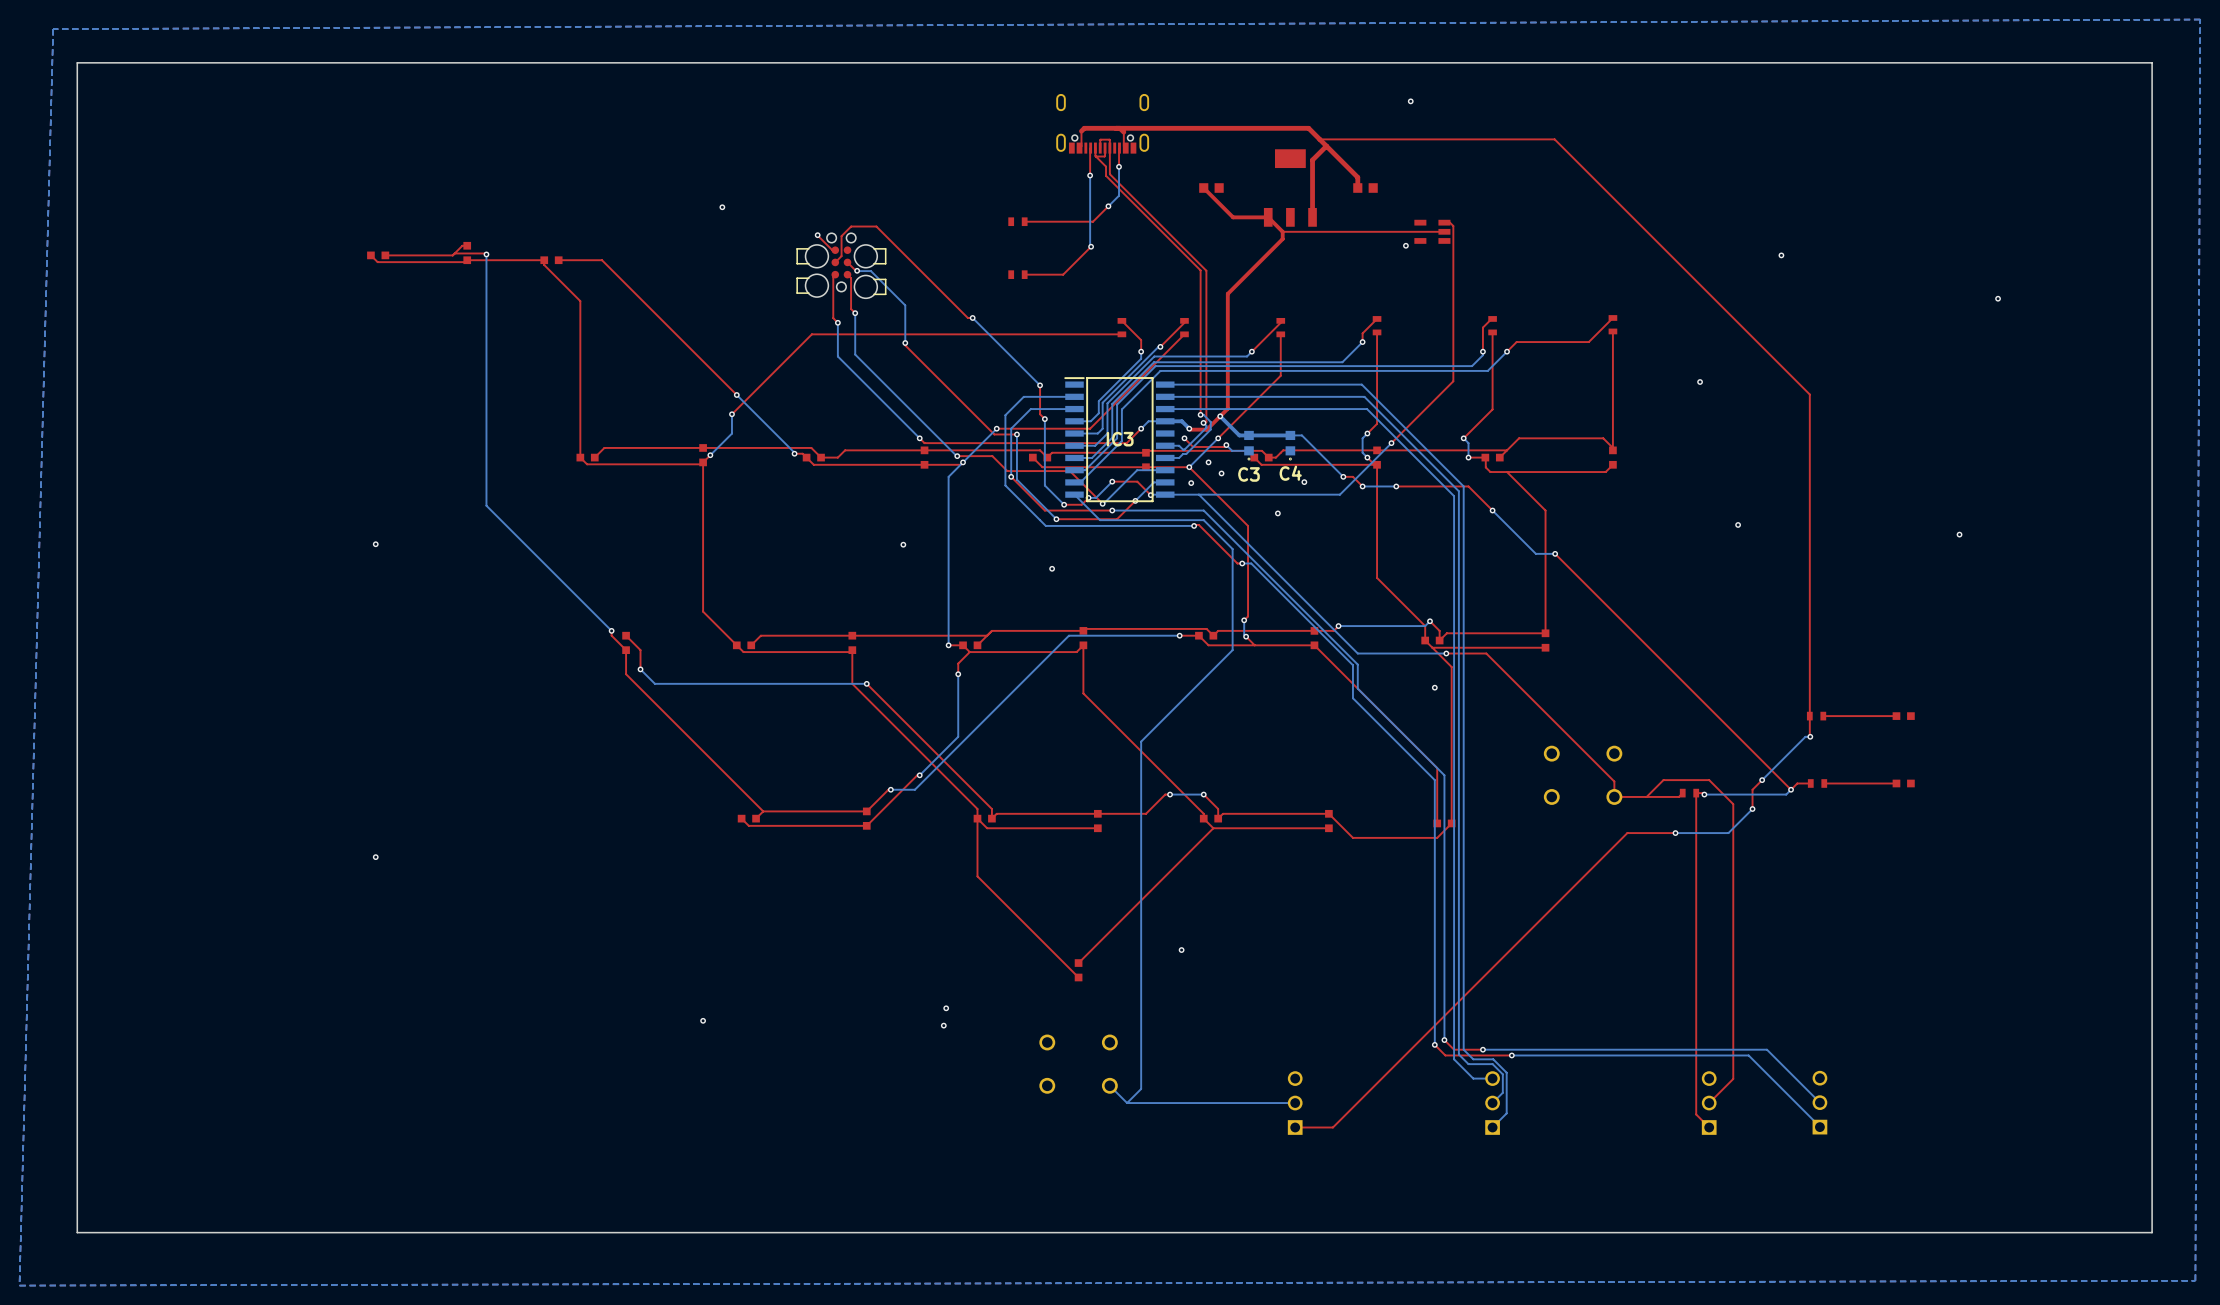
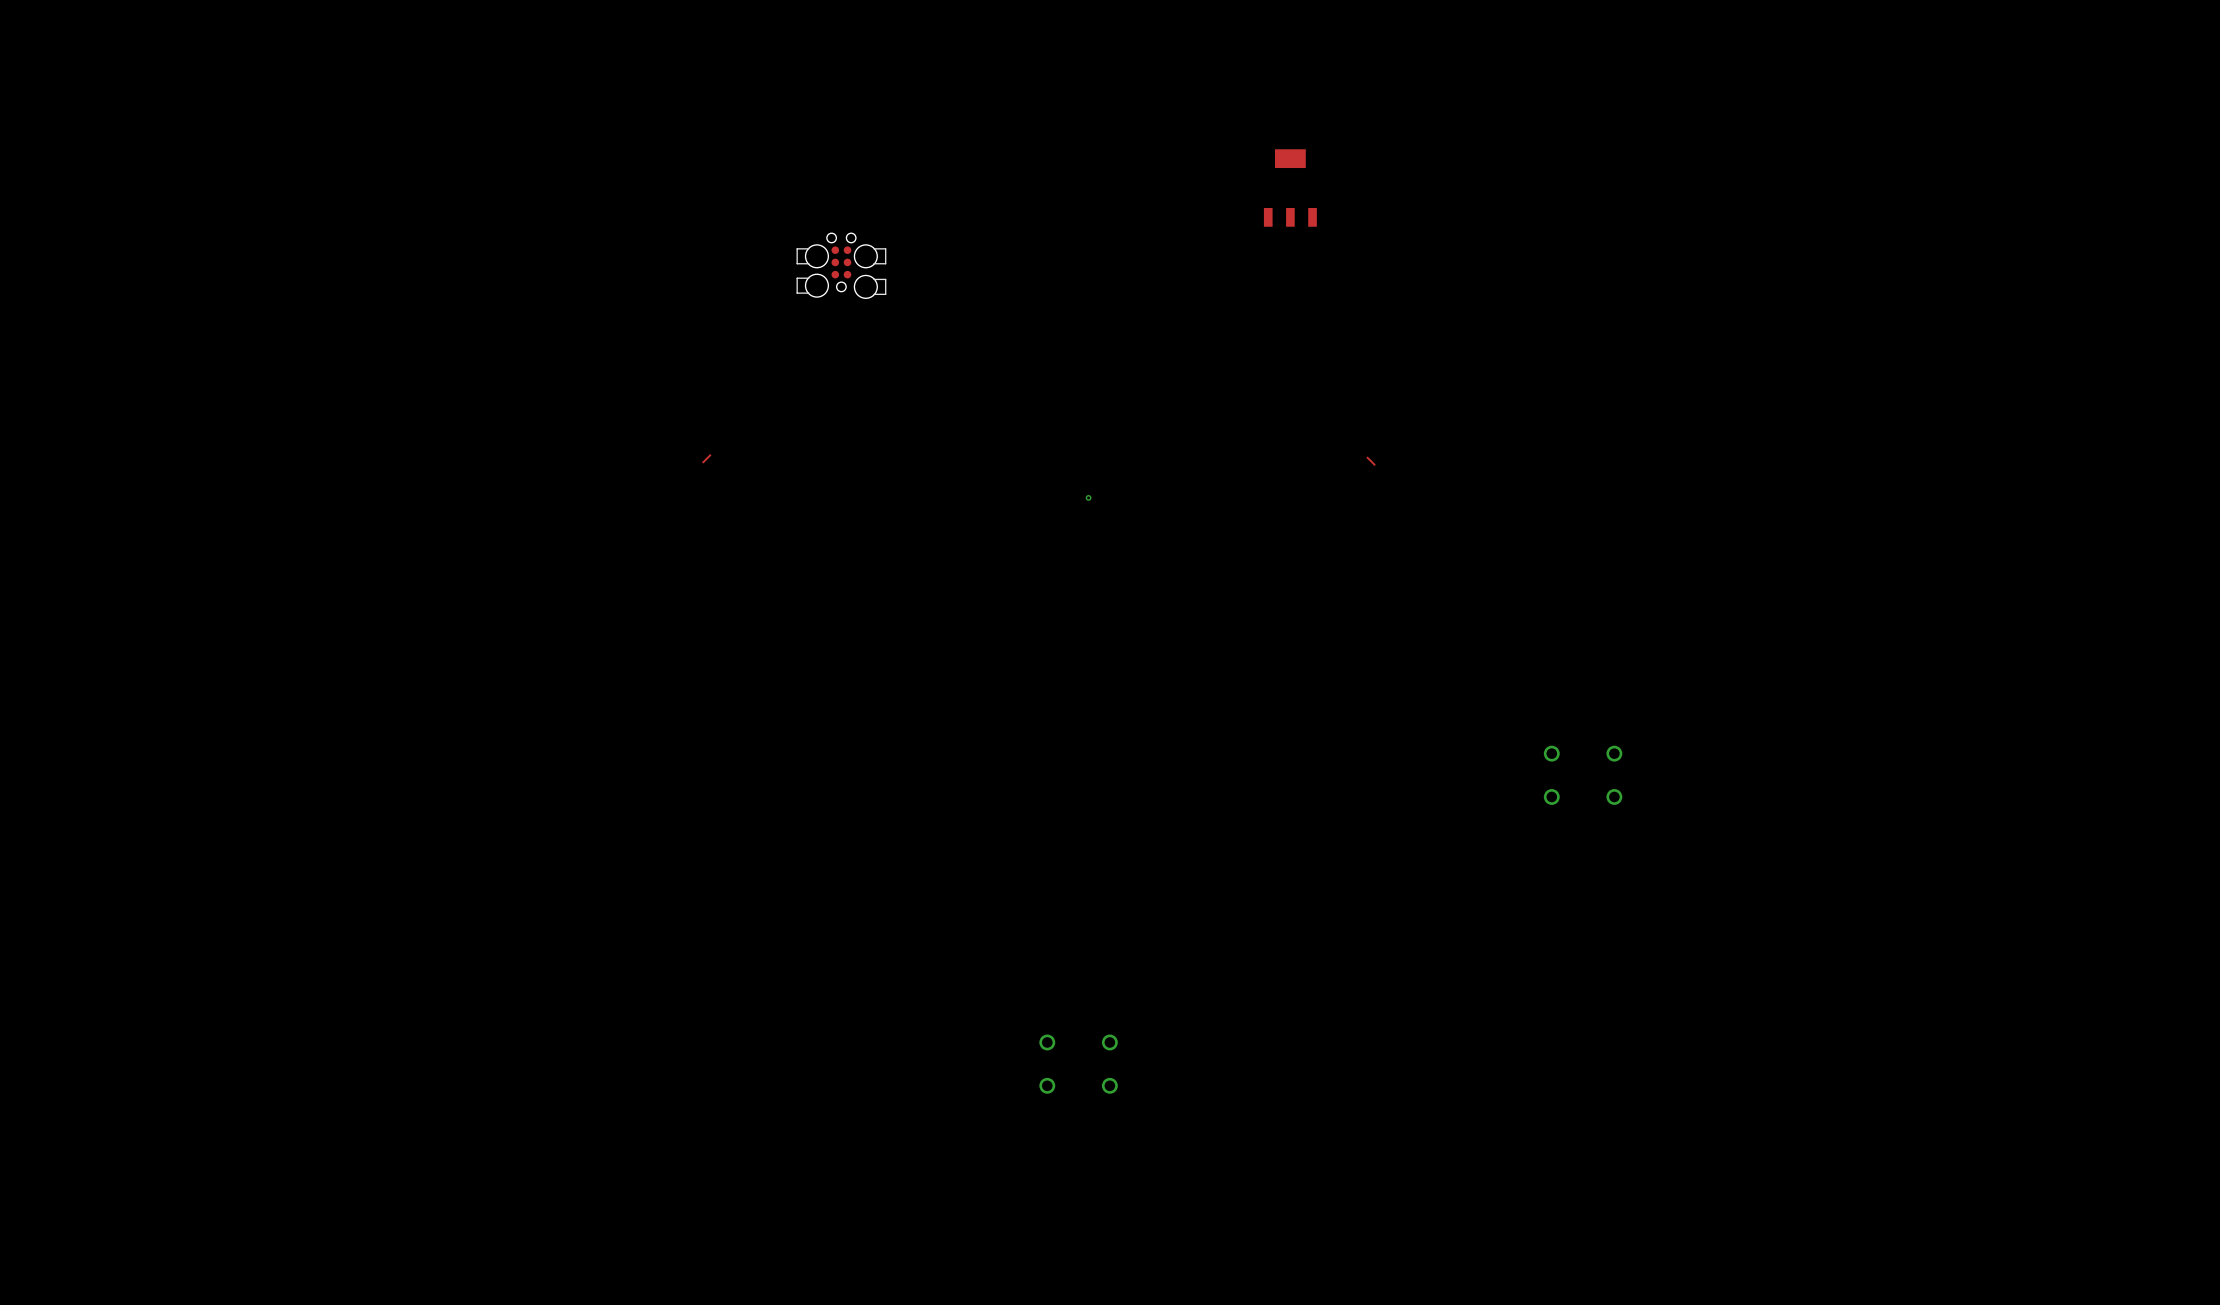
bottom zone outline: (2200, 19) (53, 29) (19, 1285) (2195, 1280) (2200, 19) -> none
board edge: (2152, 62) (77, 62) (77, 1232) (2152, 1232) (2152, 62) -> none
via: (1410, 101) -> none
part: (1102, 123) -> none
top track: (1119, 128) (1123, 132) (1123, 146) (1125, 148) -> none
top track: (1319, 139) (1554, 139) (1809, 394) (1810, 736) -> none
top track: (1326, 146) (1312, 160) (1312, 217) -> none
top track: (1079, 148) (1081, 146) (1081, 131) (1084, 128) (1308, 128) (1357, 177) (1357, 188) -> none
top track: (1090, 148) (1090, 175) -> none
top track: (1095, 148) (1095, 156) (1106, 166) (1106, 175) (1200, 270) (1200, 414) -> none
top track: (1100, 148) (1100, 139) (1109, 140) (1109, 174) (1206, 270) (1206, 421) (1203, 422) -> none
top track: (1105, 148) (1104, 156) (1095, 156) -> none
top track: (1119, 148) (1119, 166) -> none
bottom track: (1119, 166) (1119, 195) (1108, 206) -> none
via: (1119, 166) -> none
bottom track: (1090, 175) (1091, 246) -> none
via: (1090, 175) -> none
top track: (1203, 188) (1233, 217) (1268, 217) (1282, 231) -> none
part: (1211, 188) -> none
part: (1365, 188) -> none
top track: (1108, 206) (1093, 221) (1024, 221) -> none
via: (1108, 206) -> none
via: (722, 207) -> none
part: (1017, 221) -> none
top track: (1444, 222) (1449, 222) (1453, 226) (1453, 381) (1391, 443) -> none
top track: (1282, 231) (1282, 239) (1227, 293) (1227, 408) (1206, 429) (1189, 428) -> none
part: (1432, 231) -> none
top track: (1444, 231) (1282, 231) -> none
top track: (817, 235) (832, 250) (835, 250) -> none
via: (817, 235) -> none
top track: (467, 245) (462, 245) (452, 255) (385, 255) -> none
via: (1405, 245) -> none
top track: (1091, 246) (1063, 274) (1024, 274) -> none
via: (1091, 246) -> none
part: (467, 252) -> none
top track: (454, 253) (486, 254) -> none
bottom track: (486, 254) (486, 505) (611, 630) -> none
via: (486, 254) -> none
top track: (370, 255) (377, 262) (544, 260) (544, 265) (580, 301) (580, 457) (587, 464) (701, 464) (703, 462) (703, 611) (743, 652) (850, 652) (852, 650) (852, 683) (977, 809) (977, 876) (1078, 977) -> none
part: (378, 255) -> none
via: (1781, 255) -> none
part: (551, 260) -> none
top track: (558, 260) (602, 260) (736, 395) -> none
top track: (835, 262) (841, 256) (841, 236) (851, 226) (876, 226) (967, 317) (972, 317) -> none
top track: (847, 262) (857, 270) -> none
bottom track: (857, 270) (870, 271) (905, 305) (905, 343) -> none
via: (857, 270) -> none
top track: (835, 274) (833, 276) (833, 318) (837, 322) -> none
top track: (847, 274) (851, 278) (851, 309) (855, 313) -> none
part: (1017, 274) -> none
via: (1998, 298) -> none
bottom track: (855, 313) (855, 354) (957, 456) -> none
via: (855, 313) -> none
bottom track: (972, 317) (1040, 385) -> none
via: (972, 317) -> none
top track: (1612, 317) (1588, 342) (1516, 342) (1507, 351) -> none
top track: (1377, 318) (1362, 333) (1362, 342) -> none
top track: (1492, 318) (1482, 327) (1482, 351) -> none
top track: (1121, 320) (1141, 340) (1141, 351) -> none
top track: (1184, 320) (1160, 346) -> none
top track: (1280, 320) (1251, 351) -> none
bottom track: (837, 322) (837, 356) (919, 438) -> none
via: (837, 322) -> none
part: (1612, 324) -> none
part: (1377, 325) -> none
part: (1492, 325) -> none
part: (1121, 327) -> none
part: (1184, 327) -> none
part: (1280, 327) -> none
top track: (1612, 331) (1612, 450) -> none
top track: (1377, 332) (1377, 423) (1367, 433) -> none
top track: (1492, 332) (1492, 409) (1463, 438) -> none
top track: (1121, 334) (811, 334) (731, 414) -> none
top track: (1184, 334) (1090, 428) (996, 428) -> none
top track: (1280, 334) (1280, 375) (1218, 438) -> none
bottom track: (1362, 342) (1342, 362) (1154, 362) (1112, 404) (1112, 437) (1092, 457) (1074, 457) -> none
via: (1362, 342) -> none
top track: (905, 343) (905, 345) (994, 434) (1016, 434) -> none
via: (905, 343) -> none
bottom track: (1160, 346) (1102, 402) (1102, 428) (1097, 433) (1074, 433) -> none
via: (1160, 346) -> none
bottom track: (1141, 351) (1141, 358) (1098, 401) (1098, 413) (1090, 421) (1074, 421) -> none
via: (1141, 351) -> none
bottom track: (1251, 351) (1247, 356) (1154, 356) (1107, 403) (1107, 433) (1095, 445) (1074, 445) -> none
via: (1251, 351) -> none
bottom track: (1482, 351) (1482, 355) (1472, 366) (1155, 366) (1117, 404) (1117, 438) (1085, 470) (1074, 470) -> none
via: (1482, 351) -> none
bottom track: (1507, 351) (1487, 370) (1160, 370) (1121, 409) (1121, 440) (1080, 482) (1074, 482) -> none
via: (1507, 351) -> none
via: (1700, 382) -> none
bottom track: (1165, 384) (1361, 384) (1463, 486) (1463, 1049) (1473, 1059) (1493, 1059) (1506, 1072) (1506, 1113) (1492, 1127) -> none
top track: (1040, 385) (1040, 414) (1044, 419) -> none
via: (1040, 385) -> none
bottom track: (736, 395) (794, 453) -> none
via: (736, 395) -> none
bottom track: (1074, 396) (1023, 396) (1005, 415) (1005, 485) (1045, 525) (1194, 525) -> none
bottom track: (1165, 396) (1364, 396) (1458, 491) (1458, 1054) (1468, 1064) (1492, 1064) (1502, 1074) (1502, 1092) (1492, 1103) -> none
bottom track: (1074, 409) (1030, 409) (1011, 428) (1011, 476) -> none
bottom track: (1165, 409) (1367, 409) (1454, 496) (1454, 1059) (1473, 1078) (1492, 1078) -> none
bottom track: (731, 414) (731, 433) (710, 455) -> none
via: (731, 414) -> none
bottom track: (1200, 414) (1203, 414) (1210, 421) (1210, 429) (1186, 454) (1183, 454) (1179, 457) (1165, 457) -> none
via: (1200, 414) -> none
bottom track: (1220, 416) (1239, 435) (1301, 435) (1343, 476) -> none
via: (1220, 416) -> none
bottom track: (1044, 419) (1044, 485) (1064, 504) -> none
via: (1044, 419) -> none
bottom track: (1203, 422) (1206, 427) (1184, 449) (1179, 445) (1165, 445) -> none
via: (1203, 422) -> none
bottom track: (996, 428) (948, 476) (948, 645) -> none
via: (996, 428) -> none
top track: (1141, 428) (1126, 443) (924, 443) (919, 438) -> none
via: (1141, 428) -> none
bottom track: (1189, 428) (1181, 421) (1148, 421) (1141, 428) -> none
via: (1189, 428) -> none
bottom track: (1367, 433) (1362, 438) (1362, 452) (1367, 457) -> none
via: (1367, 433) -> none
bottom track: (1016, 434) (1016, 479) (1056, 519) -> none
via: (1016, 434) -> none
via: (919, 438) -> none
top track: (1184, 438) (1193, 446) (1224, 446) (1226, 445) -> none
via: (1184, 438) -> none
bottom track: (1218, 438) (1189, 467) -> none
via: (1218, 438) -> none
bottom track: (1463, 438) (1468, 443) (1468, 457) -> none
via: (1463, 438) -> none
IC3: (1119, 439) -> none
bottom track: (1391, 443) (1339, 494) (1150, 495) -> none
via: (1391, 443) -> none
bottom track: (1226, 445) (1232, 450) (1249, 450) -> none
via: (1226, 445) -> none
C3: (1249, 445) -> none
C4: (1290, 445) -> none
top track: (1612, 447) (1603, 438) (1519, 438) (1499, 457) -> none
top track: (1507, 450) (1283, 450) (1275, 457) (1268, 457) (1261, 450) (1052, 452) (1047, 457) (1040, 450) (845, 450) (837, 457) (821, 457) (811, 447) (604, 447) (594, 457) -> none
top track: (794, 453) (802, 453) (813, 464) (960, 464) (963, 462) -> none
via: (794, 453) -> none
part: (703, 455) -> none
via: (710, 455) -> none
top track: (957, 456) (992, 456) (1007, 471) (1069, 471) (1102, 503) -> none
via: (957, 456) -> none
part: (587, 457) -> none
part: (813, 457) -> none
part: (924, 457) -> none
top track: (1032, 457) (1042, 467) (1189, 467) (1248, 525) (1248, 616) (1244, 620) -> none
part: (1040, 457) -> none
top track: (1254, 457) (1261, 464) (1377, 464) (1377, 577) (1425, 626) (1425, 640) (1451, 666) (1451, 823) (1437, 837) (1352, 837) (1328, 813) (1223, 813) (1218, 818) (1218, 809) (1203, 794) -> none
part: (1261, 457) -> none
via: (1367, 457) -> none
part: (1377, 457) -> none
top track: (1468, 457) (1485, 457) (1485, 467) (1490, 472) (1605, 472) (1612, 464) -> none
via: (1468, 457) -> none
part: (1492, 457) -> none
part: (1612, 457) -> none
part: (1145, 459) -> none
via: (963, 462) -> none
via: (1208, 462) -> none
via: (1189, 467) -> none
bottom track: (1165, 470) (1137, 470) (1102, 503) -> none
top track: (1507, 472) (1545, 510) (1545, 633) (1446, 633) (1439, 640) (1439, 630) (1430, 621) -> none
via: (1221, 473) -> none
top track: (1011, 476) (1044, 510) (1112, 510) -> none
via: (1011, 476) -> none
top track: (1343, 476) (1352, 476) (1362, 486) -> none
via: (1343, 476) -> none
top track: (1112, 481) (1137, 481) (1150, 495) -> none
bottom track: (1112, 481) (1096, 497) (1088, 497) -> none
via: (1112, 481) -> none
bottom track: (1165, 482) (1153, 482) (1135, 500) -> none
via: (1304, 482) -> none
via: (1191, 483) -> none
via: (1362, 486) -> none
top track: (1396, 486) (1468, 486) (1492, 510) -> none
bottom track: (1396, 486) (1362, 486) -> none
via: (1396, 486) -> none
bottom track: (1074, 494) (1100, 520) (1203, 520) (1232, 549) (1232, 650) (1141, 741) (1141, 1088) (1127, 1103) -> none
bottom track: (1198, 494) (1357, 653) (1446, 653) -> none
via: (1150, 495) -> none
top track: (1088, 497) (1081, 504) (1064, 504) -> none
top track: (1135, 500) (1117, 519) (1056, 519) -> none
via: (1135, 500) -> none
via: (1102, 503) -> none
via: (1064, 504) -> none
bottom track: (1112, 510) (1203, 510) (1357, 664) (1357, 688) (1444, 775) (1444, 1040) -> none
via: (1112, 510) -> none
bottom track: (1492, 510) (1535, 553) (1555, 553) -> none
via: (1492, 510) -> none
via: (1277, 513) -> none
via: (1056, 519) -> none
via: (1738, 524) -> none
top track: (1194, 525) (1198, 524) (1237, 563) (1242, 563) -> none
via: (1194, 525) -> none
via: (1959, 534) -> none
via: (375, 544) -> none
via: (903, 544) -> none
top track: (1555, 553) (1791, 789) (1797, 783) (1810, 783) -> none
via: (1555, 553) -> none
bottom track: (1242, 563) (1251, 563) (1352, 665) (1352, 698) (1434, 780) (1434, 1044) -> none
via: (1242, 563) -> none
via: (1052, 568) -> none
bottom track: (1244, 620) (1244, 634) (1246, 636) -> none
via: (1244, 620) -> none
bottom track: (1430, 621) (1425, 626) (1338, 626) -> none
via: (1430, 621) -> none
top track: (1338, 626) (1333, 630) (1218, 630) (1213, 635) (1206, 628) (991, 630) (977, 645) -> none
via: (1338, 626) -> none
top track: (611, 630) (611, 635) (626, 650) (626, 674) (763, 811) -> none
via: (611, 630) -> none
top track: (626, 635) (640, 650) (640, 669) -> none
top track: (987, 635) (760, 635) (751, 645) -> none
top track: (1179, 635) (1198, 635) (1208, 645) (1314, 645) (1437, 768) (1437, 823) -> none
bottom track: (1179, 635) (1068, 635) (914, 789) (890, 789) -> none
via: (1179, 635) -> none
part: (1206, 635) -> none
top track: (1246, 636) (1254, 645) -> none
via: (1246, 636) -> none
part: (1083, 638) -> none
part: (1314, 638) -> none
part: (1432, 640) -> none
part: (1545, 640) -> none
part: (626, 642) -> none
part: (852, 642) -> none
part: (744, 645) -> none
top track: (948, 645) (963, 645) (969, 652) -> none
via: (948, 645) -> none
part: (970, 645) -> none
top track: (1545, 647) (1432, 647) -> none
top track: (969, 652) (1076, 652) (1083, 645) (1083, 693) (1203, 813) (1203, 818) (1213, 828) -> none
top track: (969, 652) (958, 663) (958, 674) -> none
top track: (1446, 653) (1486, 653) (1614, 781) (1614, 796) (1678, 796) (1682, 793) -> none
via: (1446, 653) -> none
bottom track: (640, 669) (654, 683) (866, 683) -> none
via: (640, 669) -> none
bottom track: (958, 674) (958, 736) (919, 775) -> none
via: (958, 674) -> none
top track: (866, 683) (991, 809) (991, 818) (996, 813) (1145, 813) (1165, 794) (1170, 794) -> none
via: (866, 683) -> none
via: (1434, 687) -> none
part: (1816, 716) -> none
top track: (1896, 716) (1823, 716) -> none
part: (1903, 716) -> none
bottom track: (1810, 736) (1805, 736) (1762, 780) -> none
via: (1810, 736) -> none
top track: (919, 775) (917, 775) (866, 825) (748, 825) (741, 818) -> none
via: (919, 775) -> none
top track: (1762, 780) (1752, 789) (1752, 809) -> none
via: (1762, 780) -> none
part: (1817, 783) -> none
top track: (1896, 783) (1824, 783) -> none
part: (1903, 783) -> none
top track: (890, 789) (888, 789) (866, 811) (763, 811) -> none
via: (890, 789) -> none
bottom track: (1791, 789) (1786, 794) (1704, 794) -> none
via: (1791, 789) -> none
part: (1689, 793) -> none
via: (1170, 794) -> none
bottom track: (1203, 794) (1170, 794) -> none
via: (1203, 794) -> none
top track: (1704, 794) (1696, 793) (1696, 1114) (1709, 1127) -> none
via: (1704, 794) -> none
top track: (1646, 796) (1663, 780) (1709, 780) (1733, 804) (1733, 1078) (1709, 1103) -> none
bottom track: (1752, 809) (1728, 833) (1675, 833) -> none
via: (1752, 809) -> none
top track: (763, 811) (756, 818) -> none
part: (748, 818) -> none
part: (866, 818) -> none
top track: (977, 818) (987, 828) (1097, 828) -> none
part: (984, 818) -> none
part: (1210, 818) -> none
part: (1097, 821) -> none
part: (1328, 821) -> none
part: (1444, 823) -> none
top track: (1213, 828) (1078, 963) -> none
top track: (1328, 828) (1213, 828) -> none
top track: (1675, 833) (1627, 833) (1332, 1127) (1295, 1127) -> none
via: (1675, 833) -> none
via: (375, 857) -> none
via: (1181, 950) -> none
part: (1078, 970) -> none
via: (946, 1008) -> none
via: (703, 1020) -> none
via: (943, 1025) -> none
top track: (1444, 1040) (1454, 1049) (1482, 1049) -> none
via: (1444, 1040) -> none
top track: (1434, 1044) (1445, 1055) (1511, 1055) -> none
via: (1434, 1044) -> none
bottom track: (1482, 1049) (1766, 1049) (1819, 1102) -> none
via: (1482, 1049) -> none
bottom track: (1511, 1055) (1748, 1055) (1819, 1127) -> none
via: (1511, 1055) -> none
bottom track: (1109, 1085) (1127, 1103) -> none
part: (1819, 1102) -> none
bottom track: (1295, 1103) (1127, 1103) -> none
part: (1295, 1103) -> none
part: (1492, 1103) -> none
part: (1709, 1103) -> none

